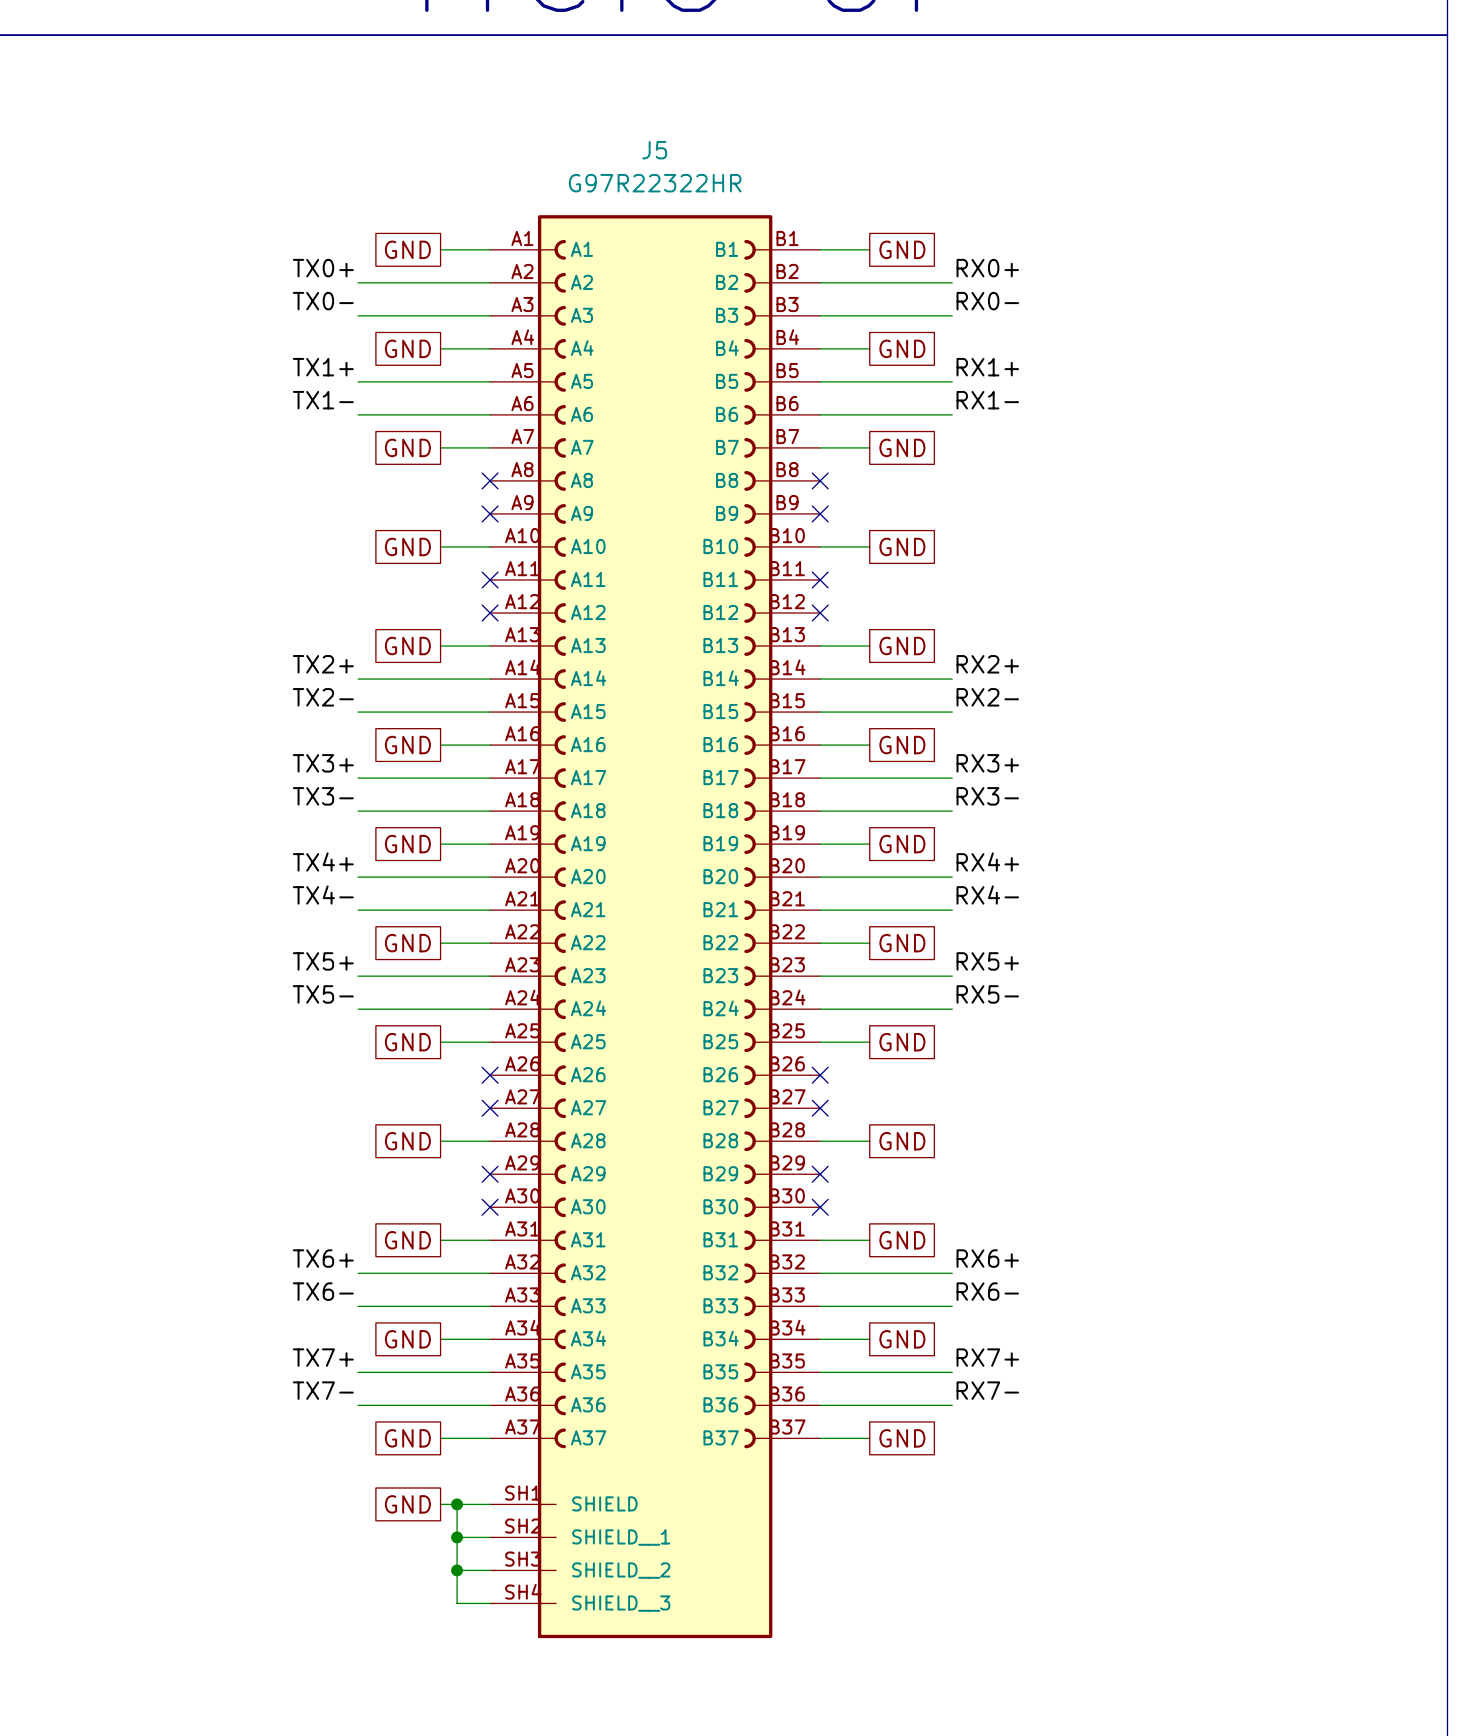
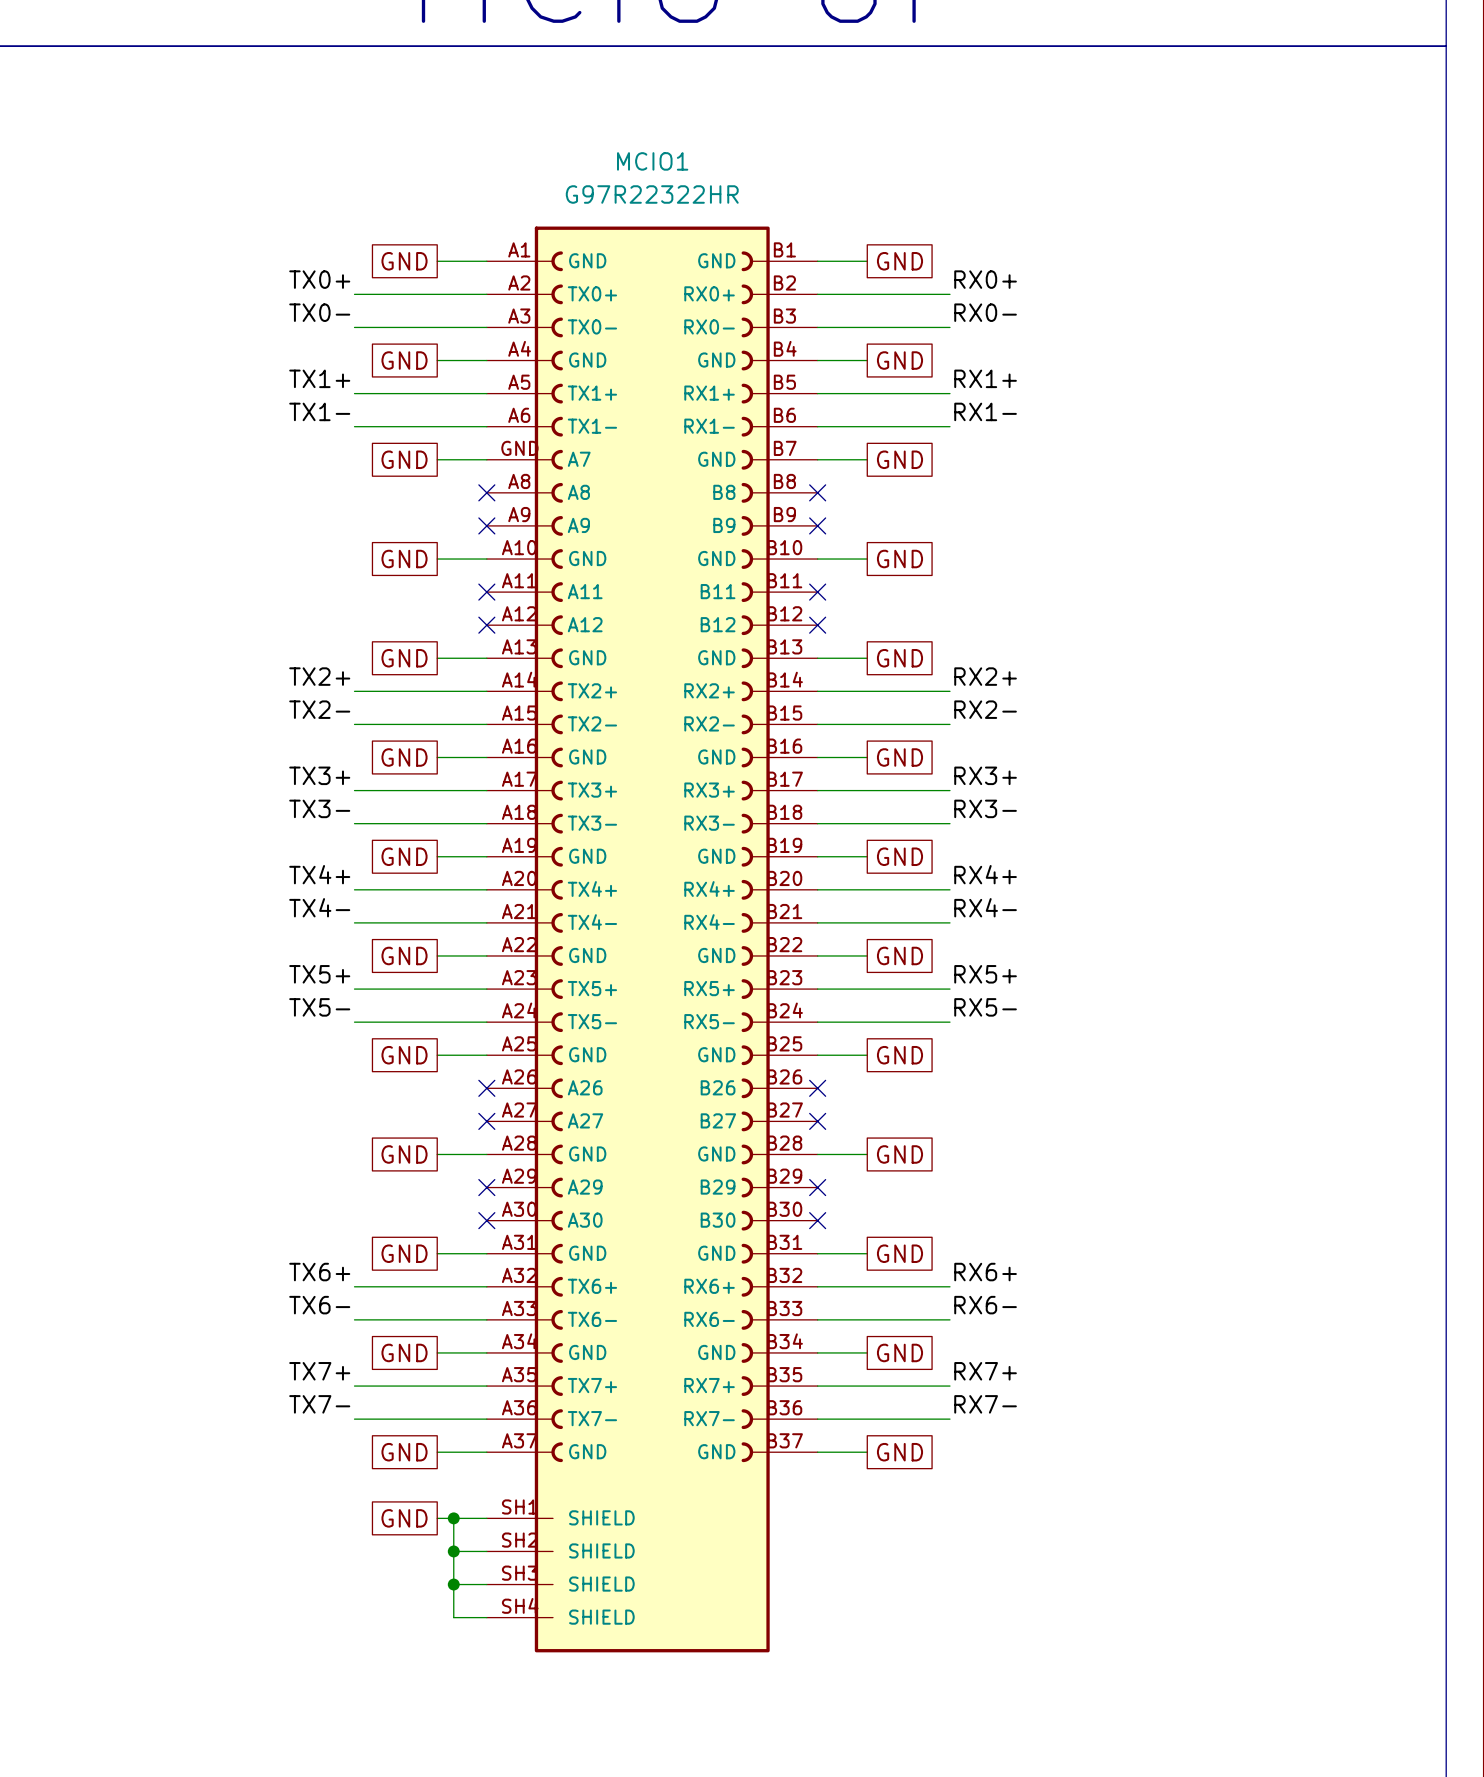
J5 name: J5 (654, 150) -> MCIO1 (652, 161)
J5 symbol: [490, 215, 821, 1639] -> [486, 226, 818, 1653]

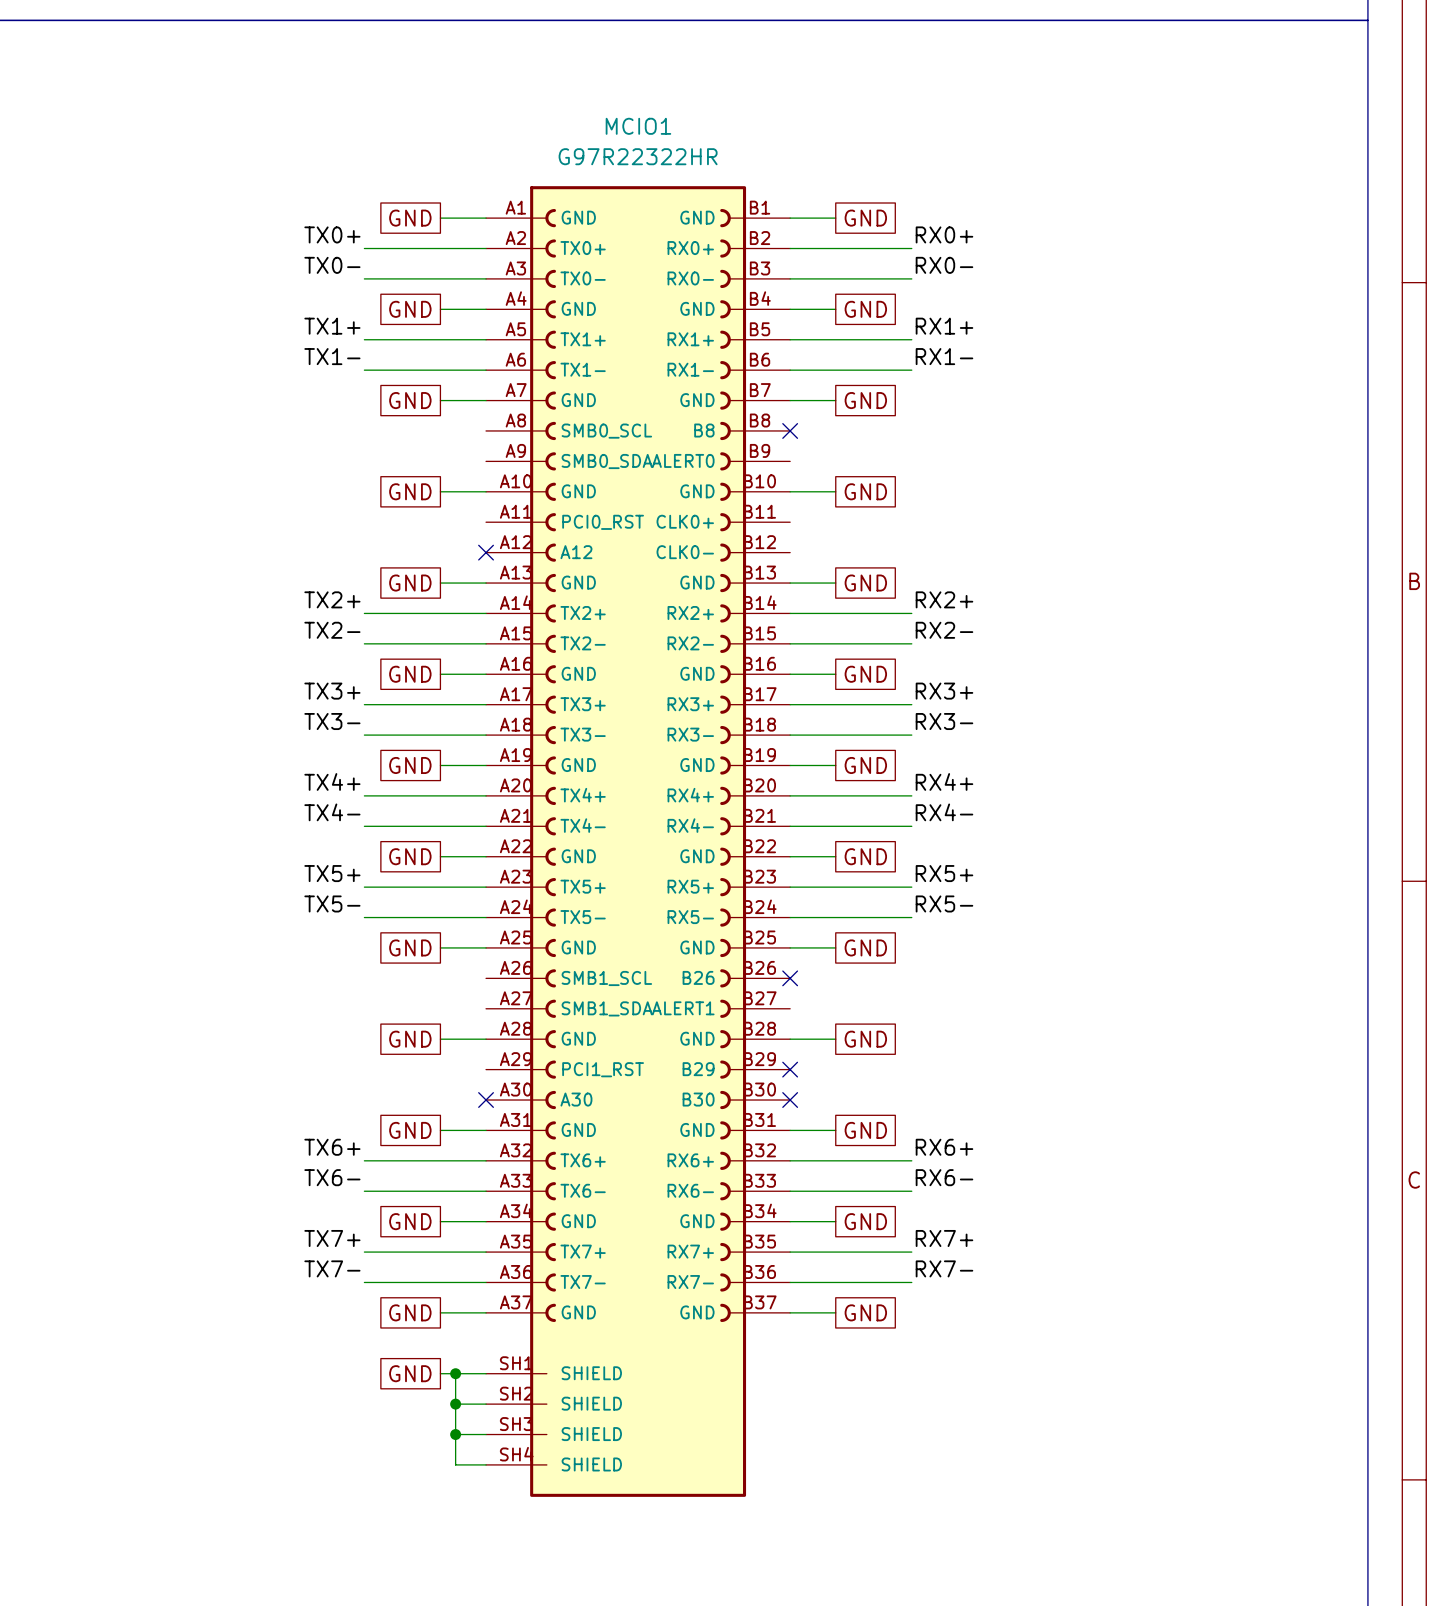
MCIO1 symbol: [486, 226, 818, 1653] -> [486, 186, 791, 1497]
no-connect mark: (486, 492) -> none
no-connect mark: (486, 525) -> none
no-connect mark: (817, 525) -> none
no-connect mark: (486, 592) -> none
no-connect mark: (817, 592) -> none
no-connect mark: (817, 625) -> none
no-connect mark: (486, 1088) -> none
no-connect mark: (486, 1121) -> none
no-connect mark: (817, 1121) -> none
no-connect mark: (486, 1187) -> none

